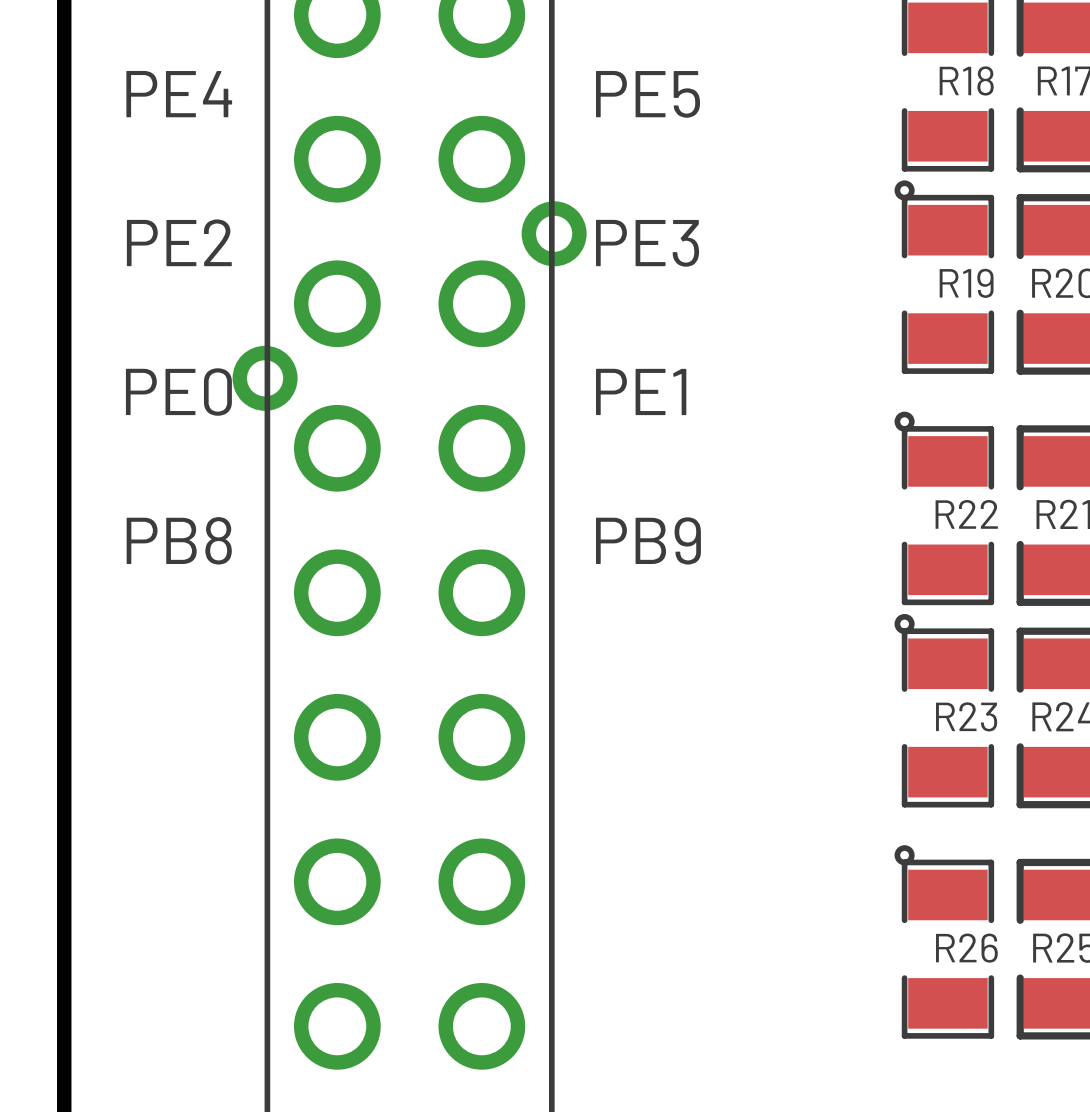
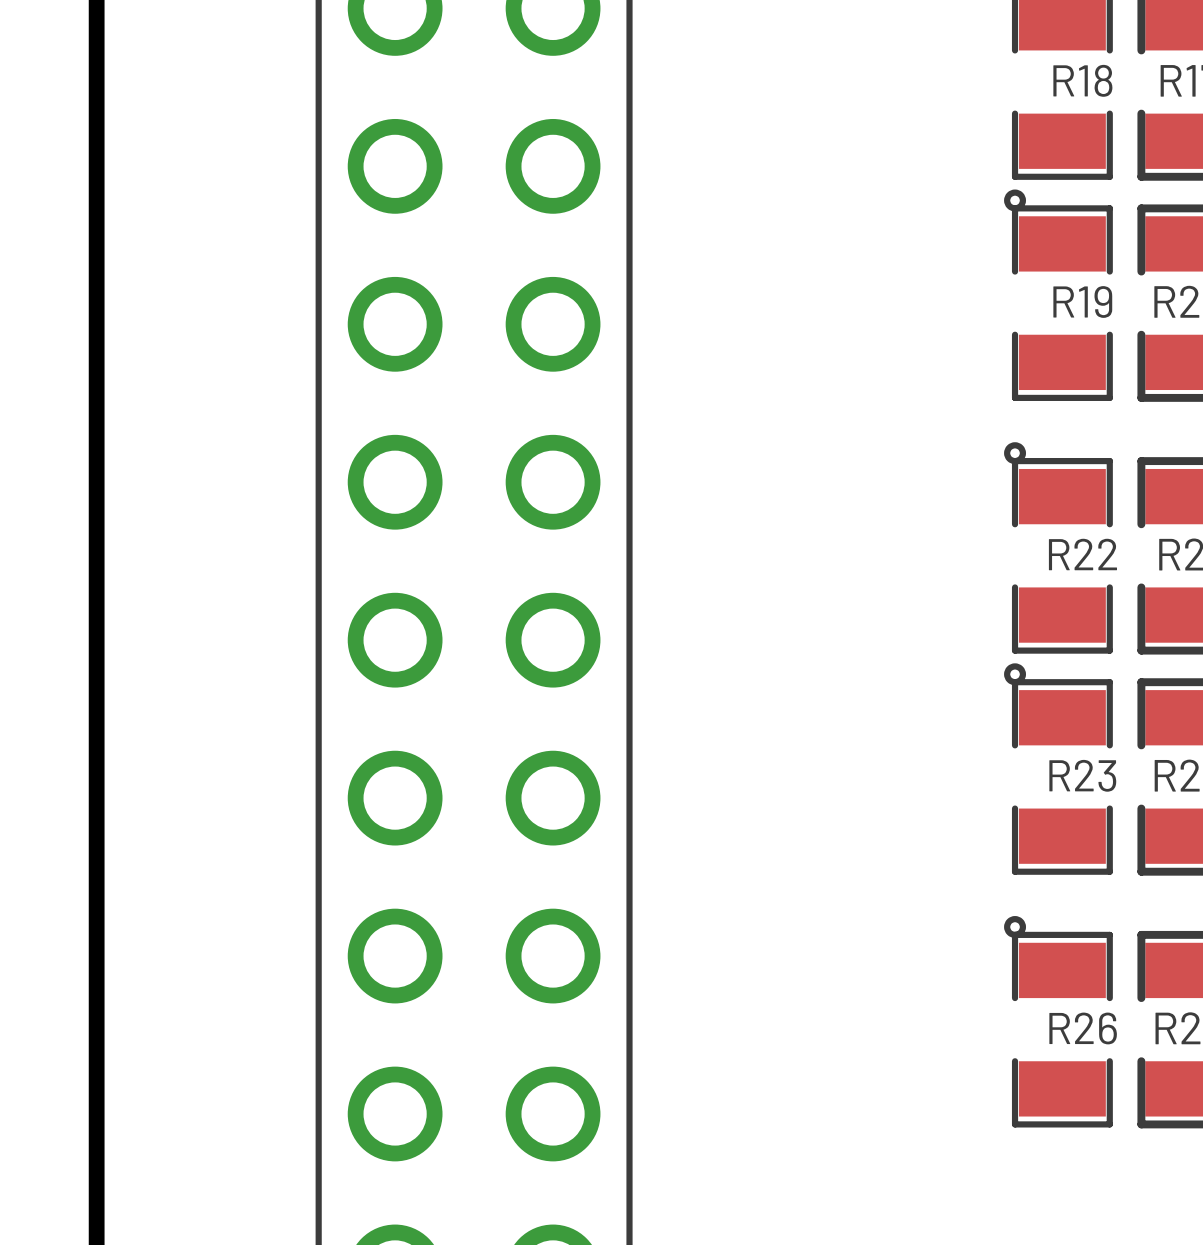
text: PE4 (179, 94) -> none
text: PE5 (648, 94) -> none
part: (554, 233) -> none
text: PE2 (179, 242) -> none
text: PE3 (647, 243) -> none
part: (265, 378) -> none
text: PE1 (641, 391) -> none
text: PE0 (178, 392) -> none
text: PB8 (179, 540) -> none
text: PB9 (648, 540) -> none

